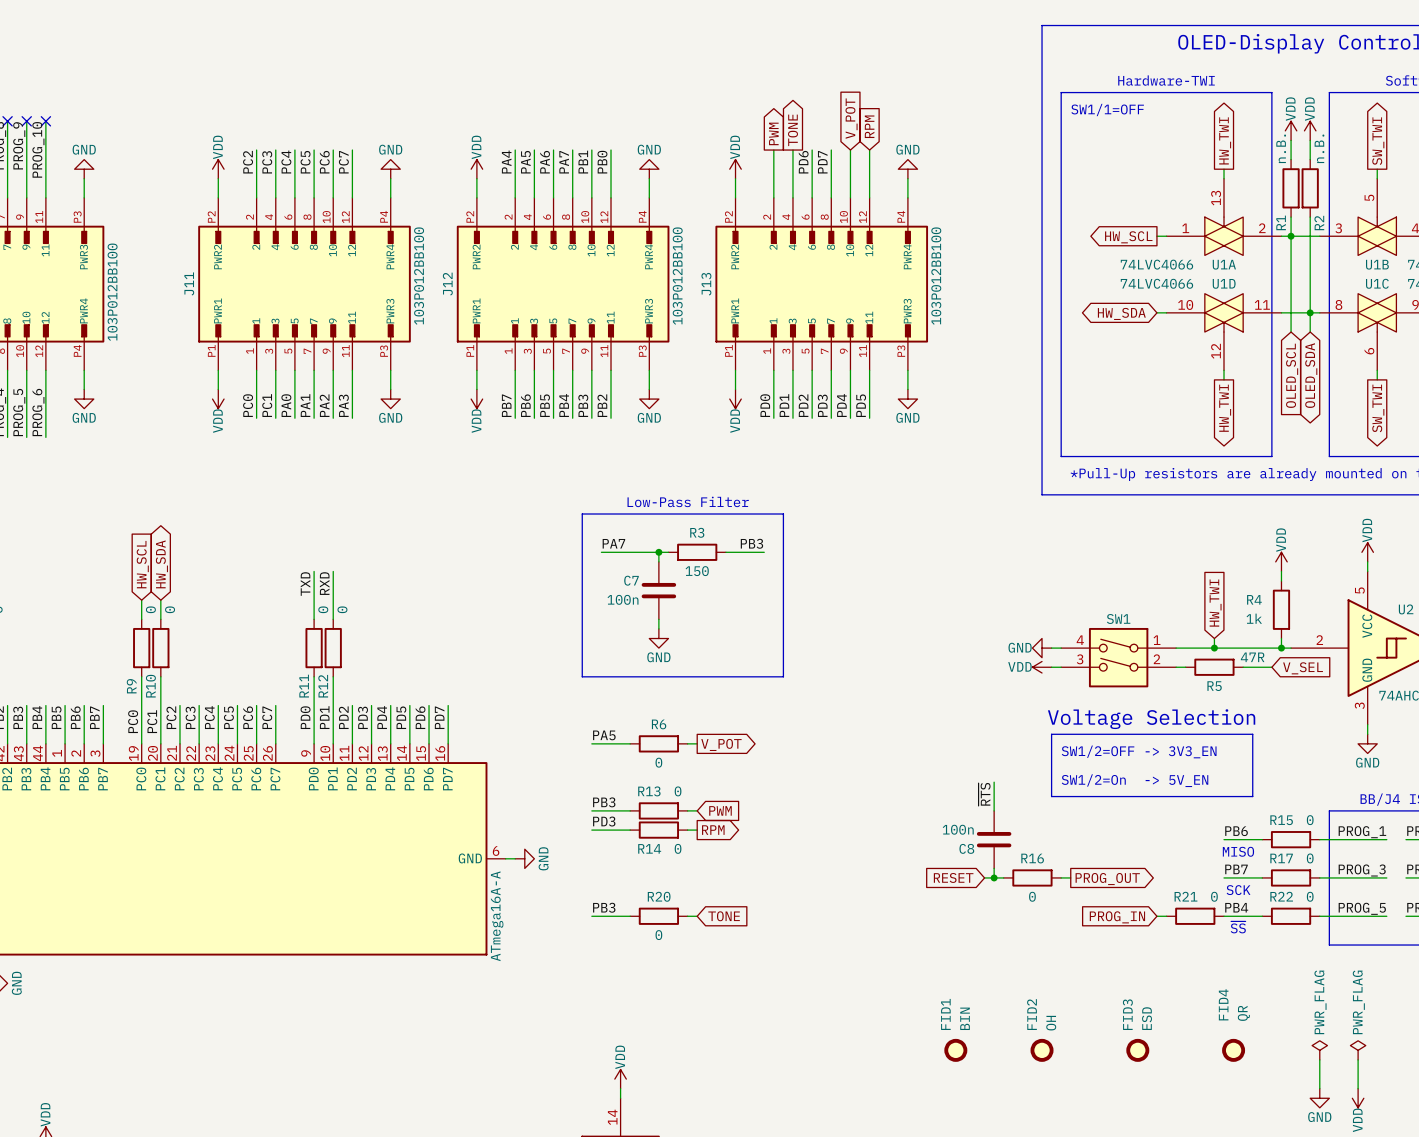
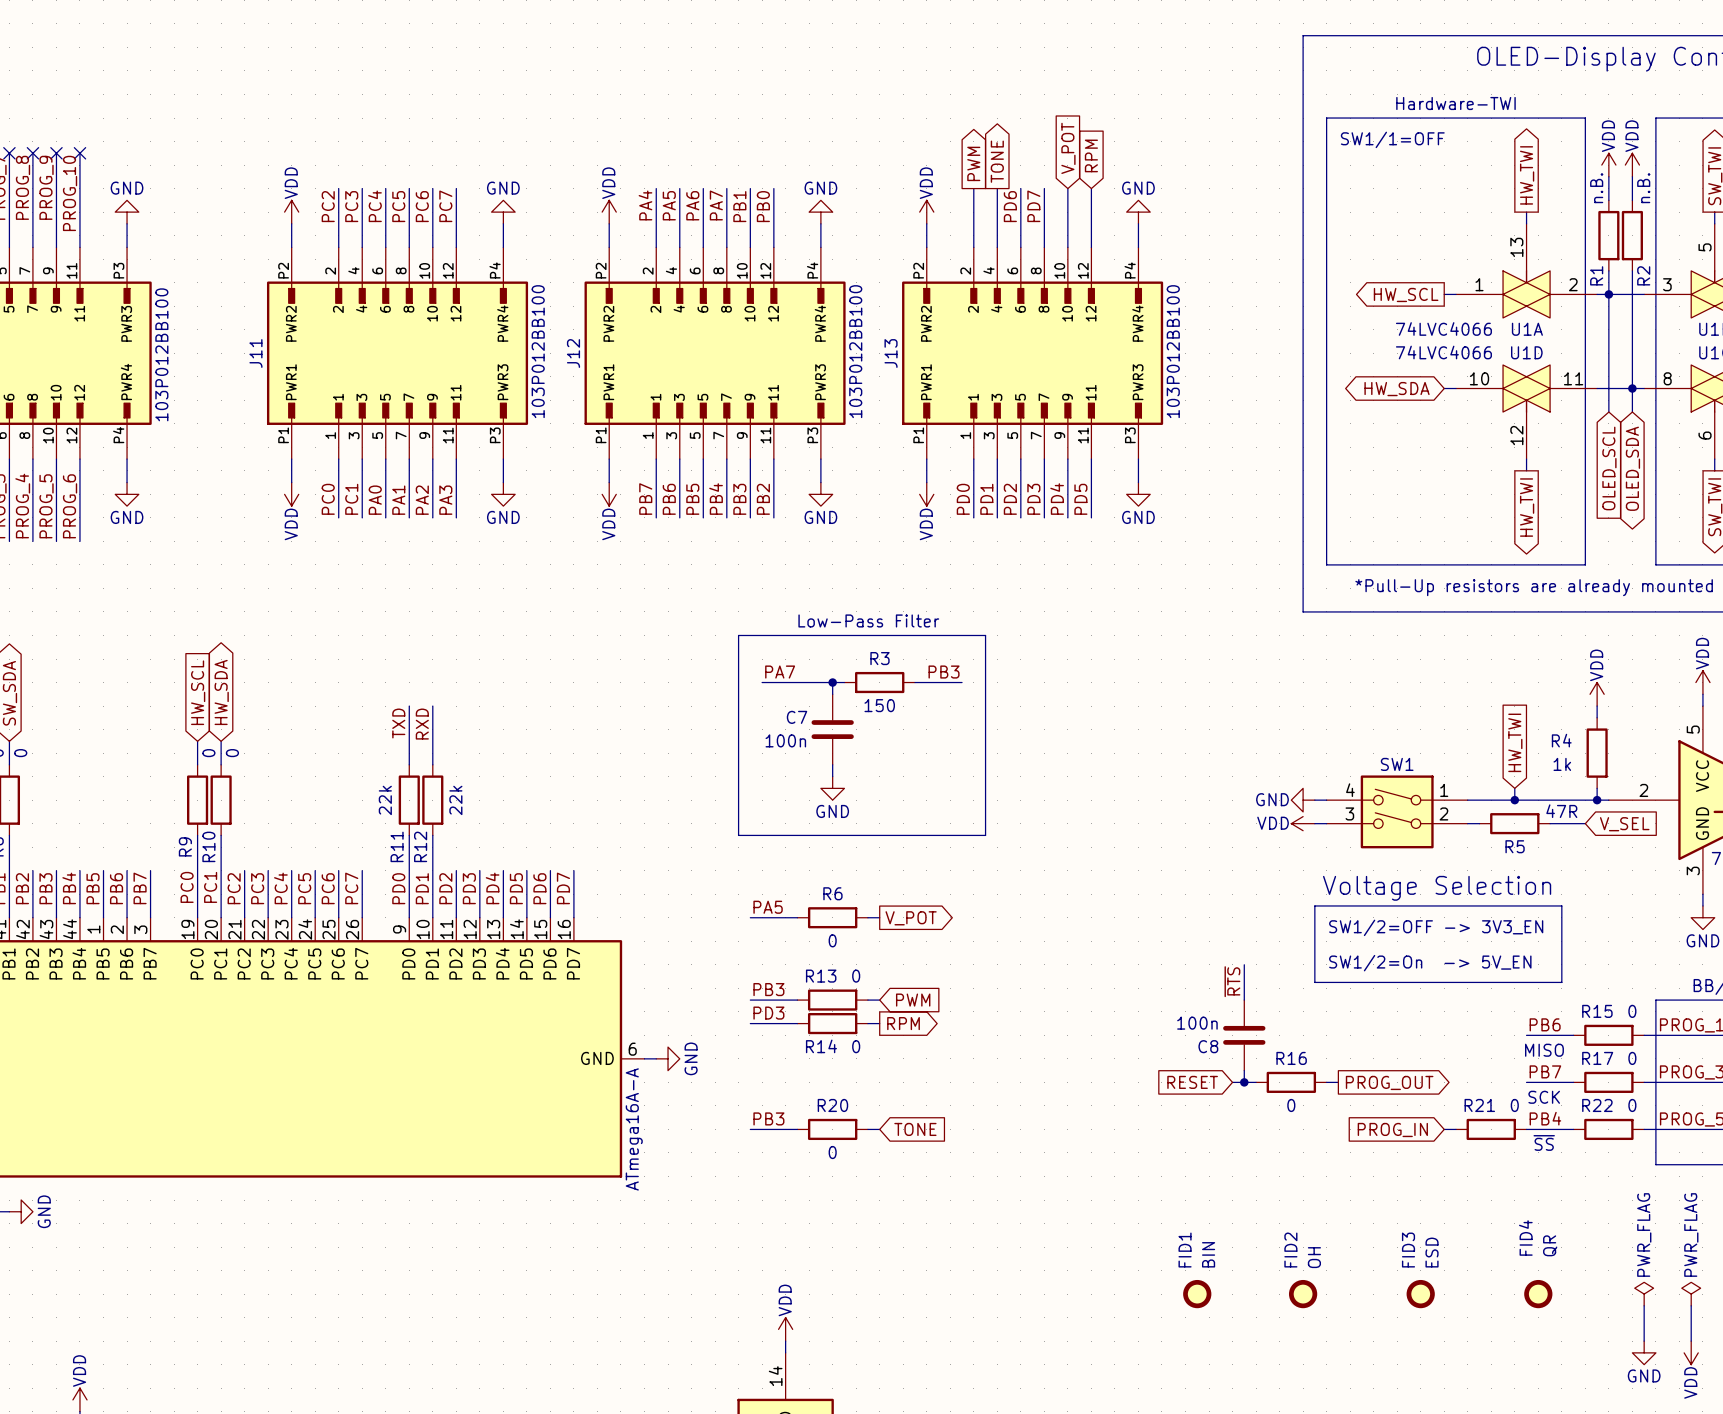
R11 value: 0 (323, 609) -> 22k (385, 800)
R12 value: 0 (342, 609) -> 22k (455, 800)

